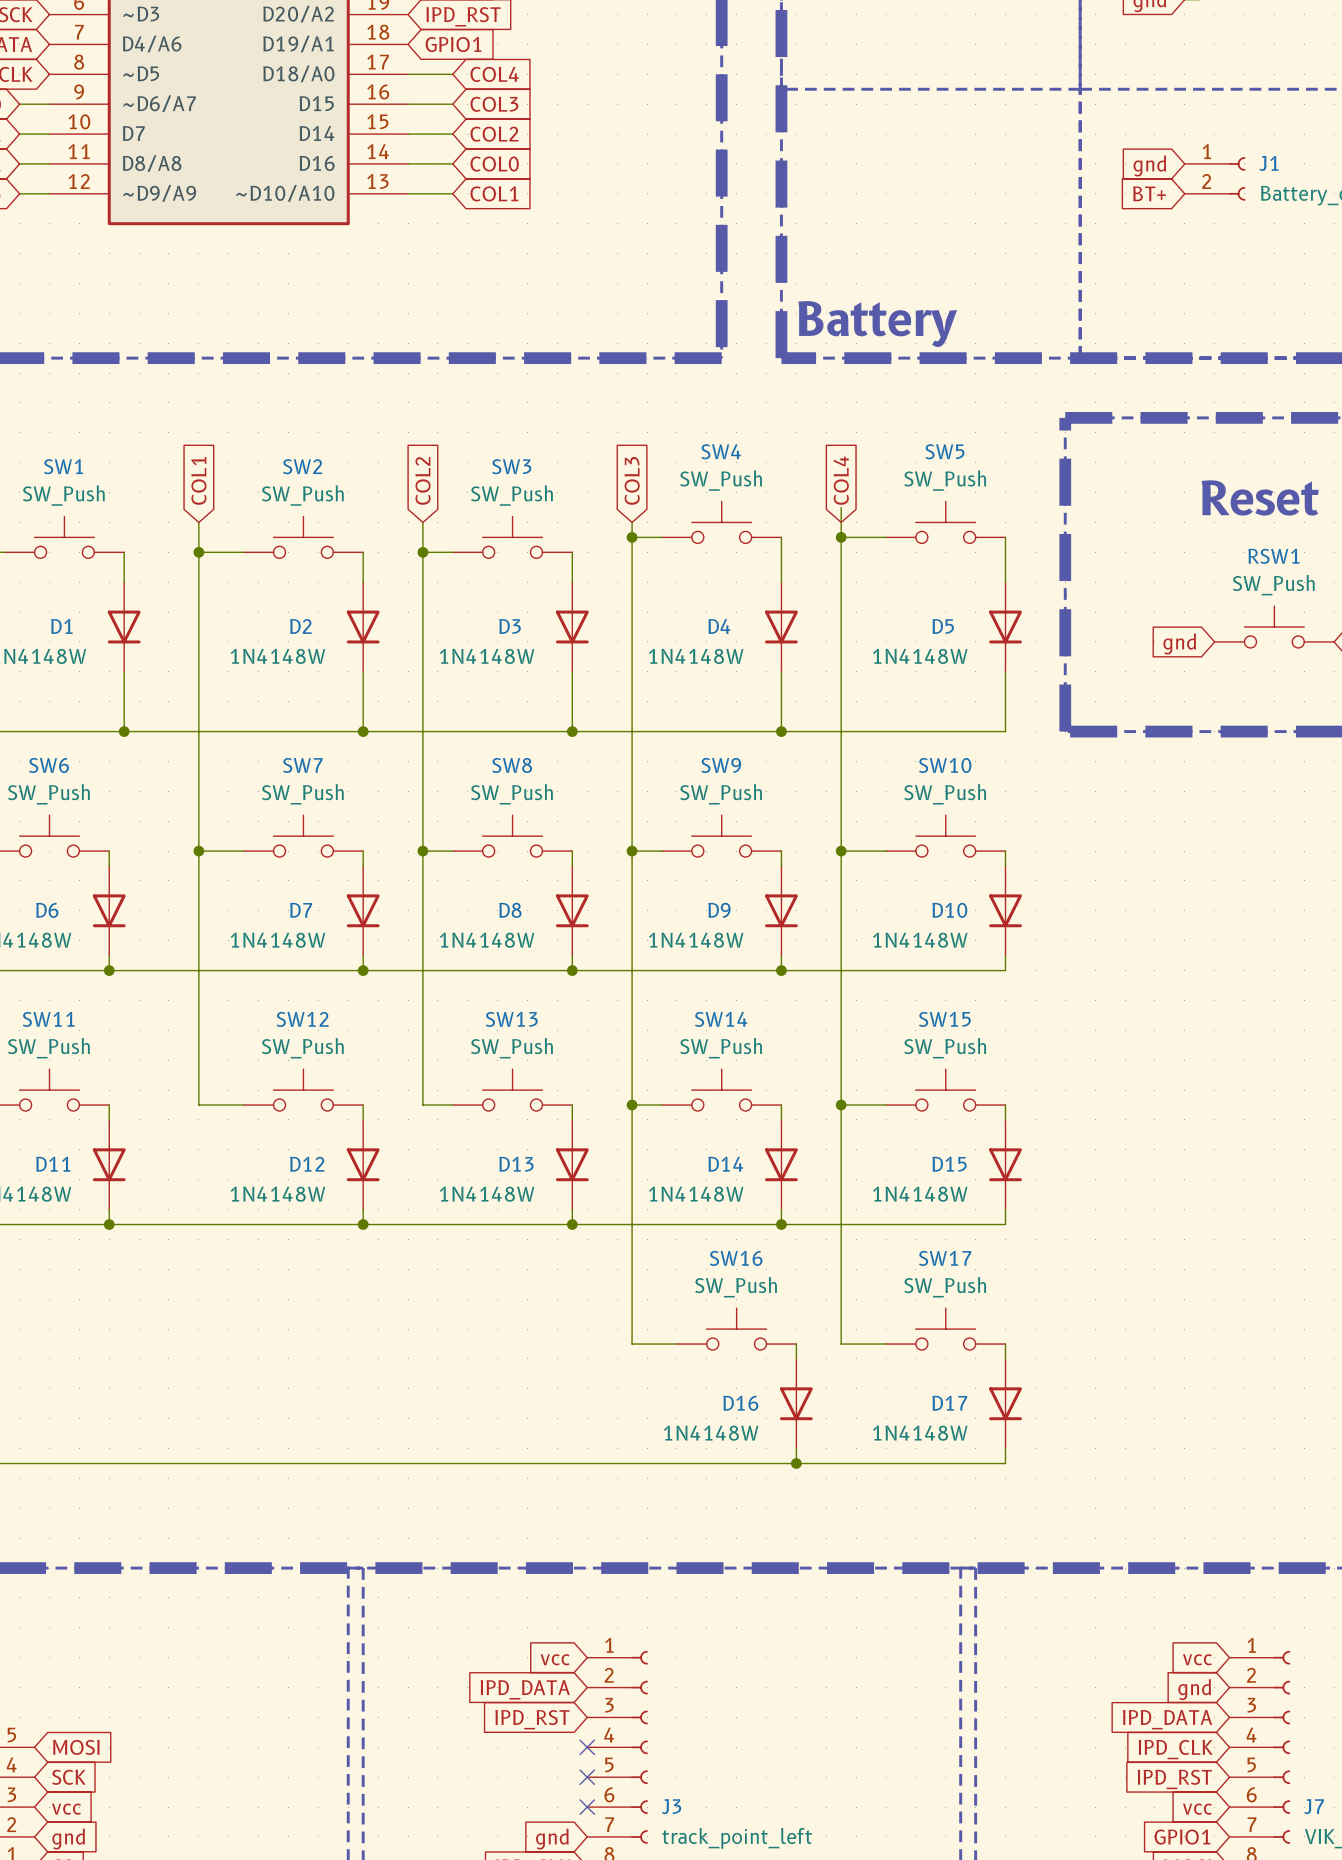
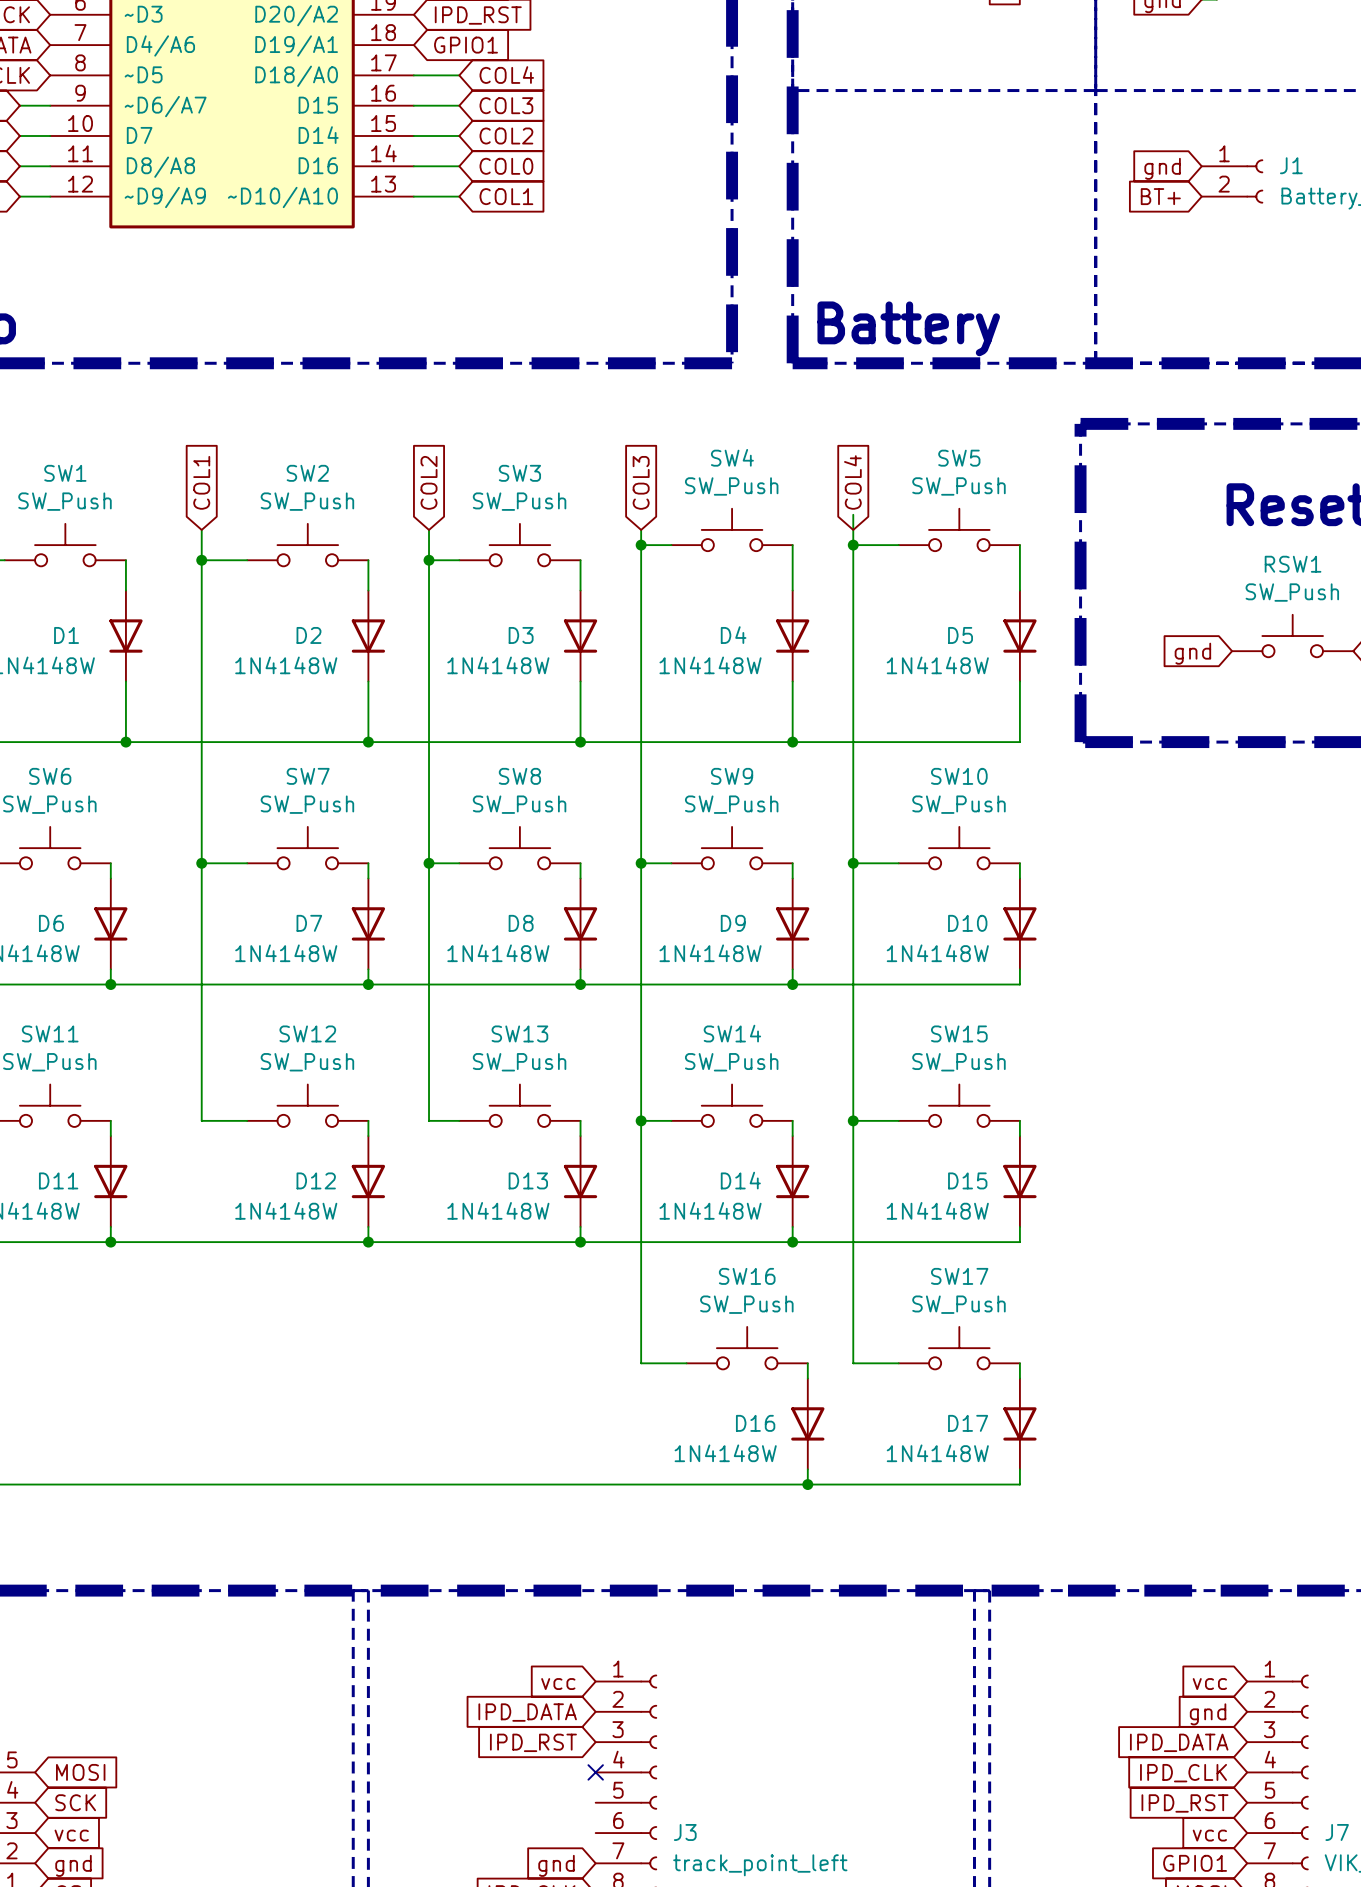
no-connect mark: (587, 1777) -> none
no-connect mark: (587, 1807) -> none

